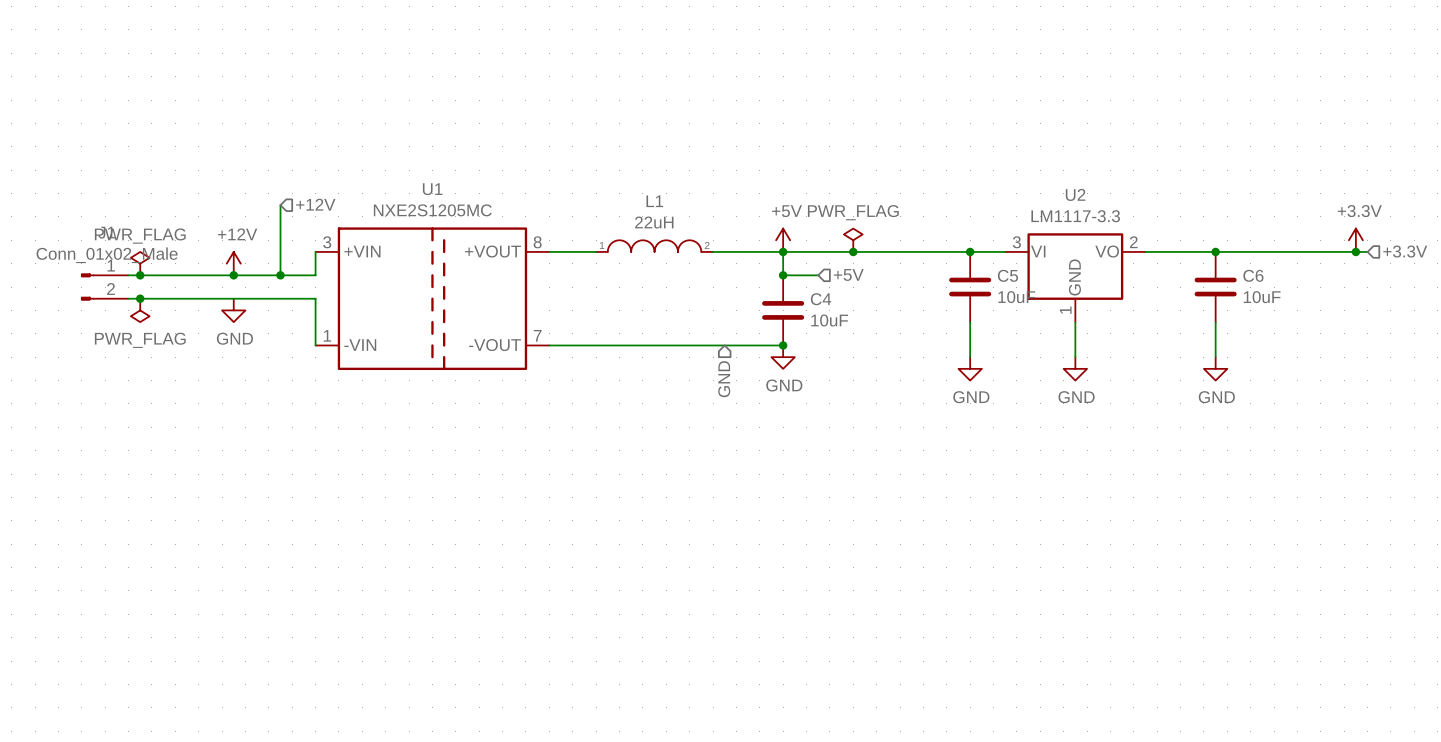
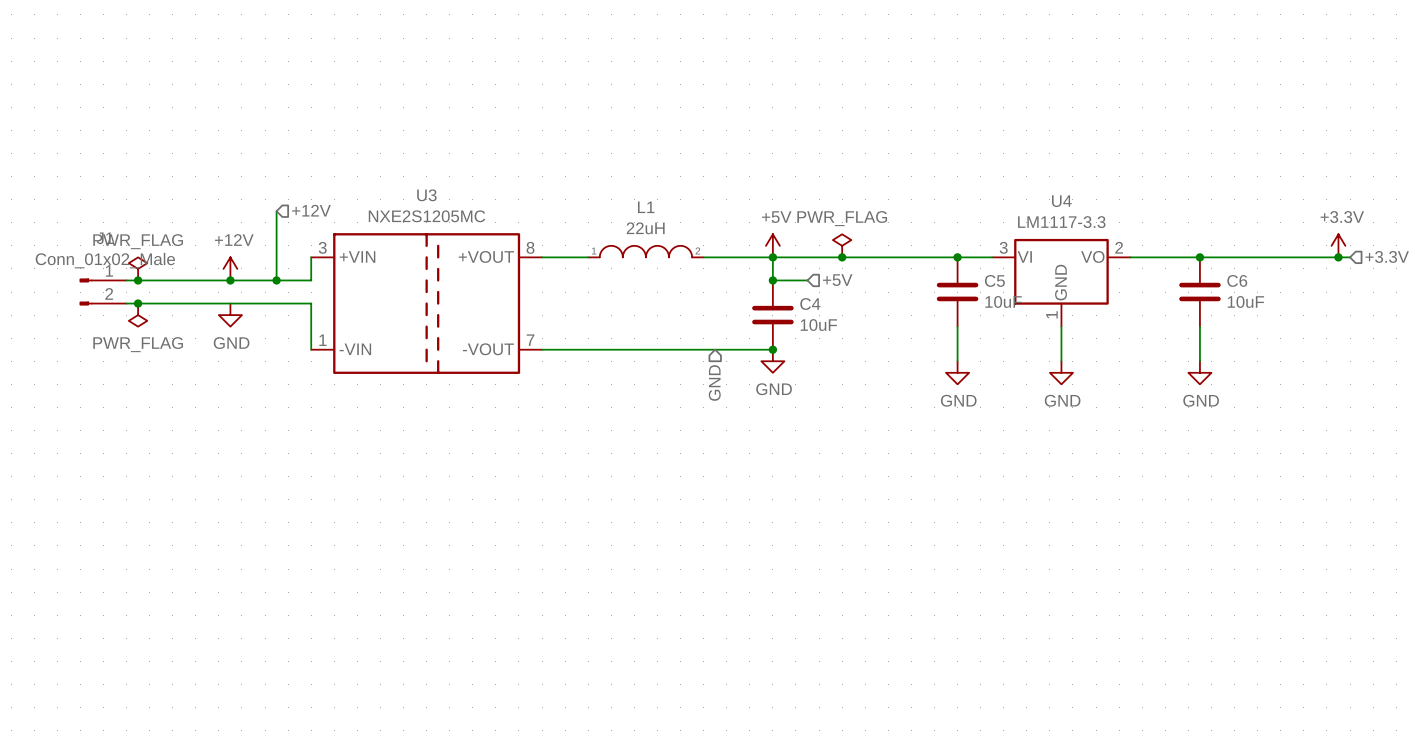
U1 name: U1 (432, 189) -> U3 (426, 195)
U2 name: U2 (1075, 194) -> U4 (1061, 201)

